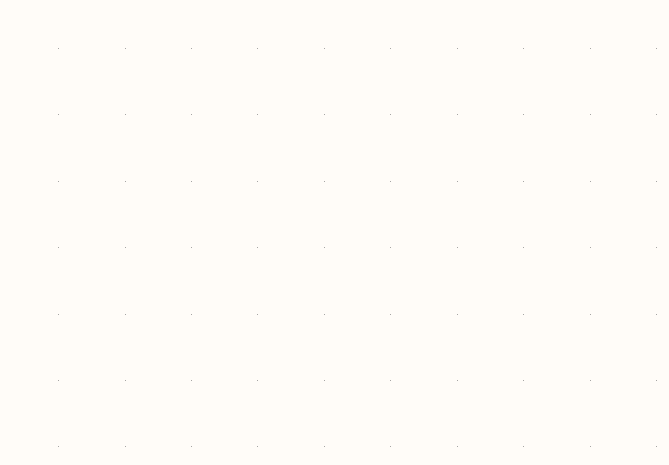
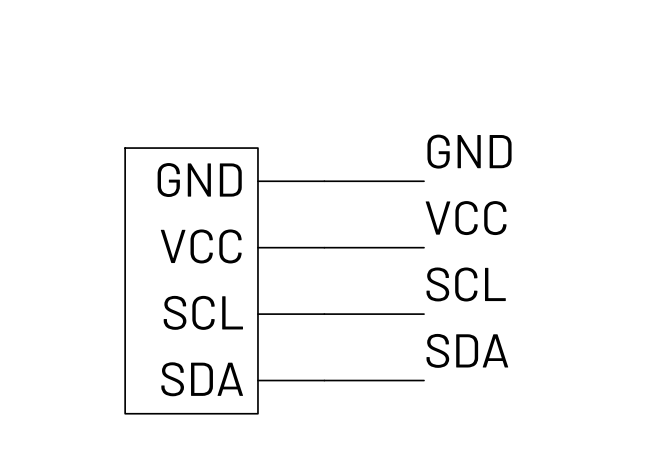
label: none -> GND (469, 151)
wire: none -> (324, 181) (424, 181)
label: none -> VCC (466, 218)
wire: none -> (324, 247) (424, 247)
part: none -> (224, 280)
label: none -> SCL (466, 284)
wire: none -> (324, 314) (424, 314)
label: none -> SDA (467, 350)
wire: none -> (324, 380) (424, 380)

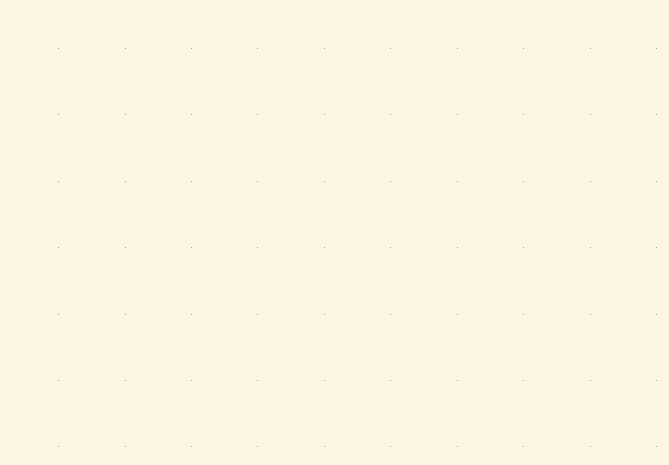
label: GND (469, 151) -> none
wire: (324, 181) (424, 181) -> none
label: VCC (466, 218) -> none
wire: (324, 247) (424, 247) -> none
part: (224, 280) -> none
label: SCL (466, 284) -> none
wire: (324, 314) (424, 314) -> none
label: SDA (467, 350) -> none
wire: (324, 380) (424, 380) -> none

